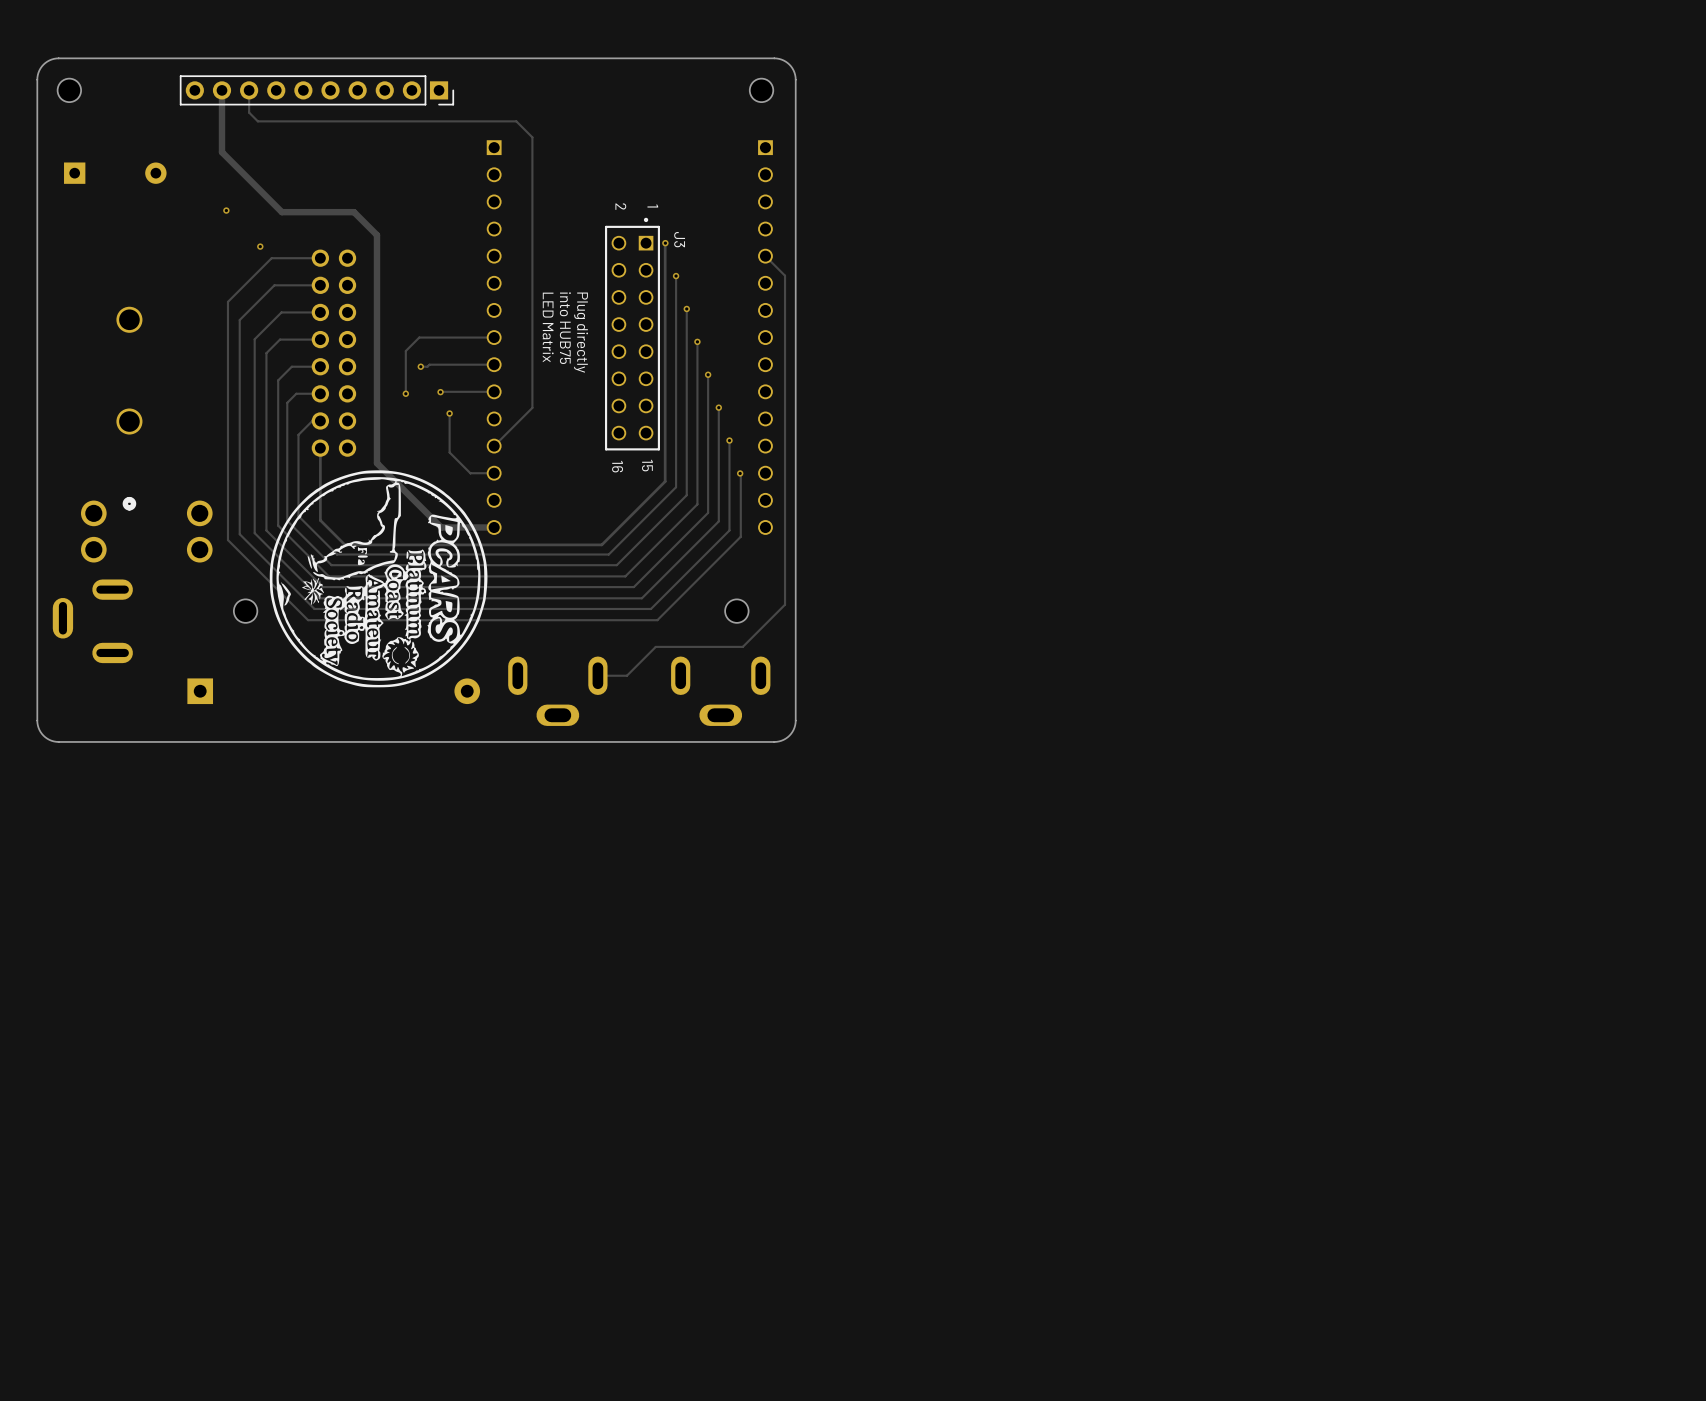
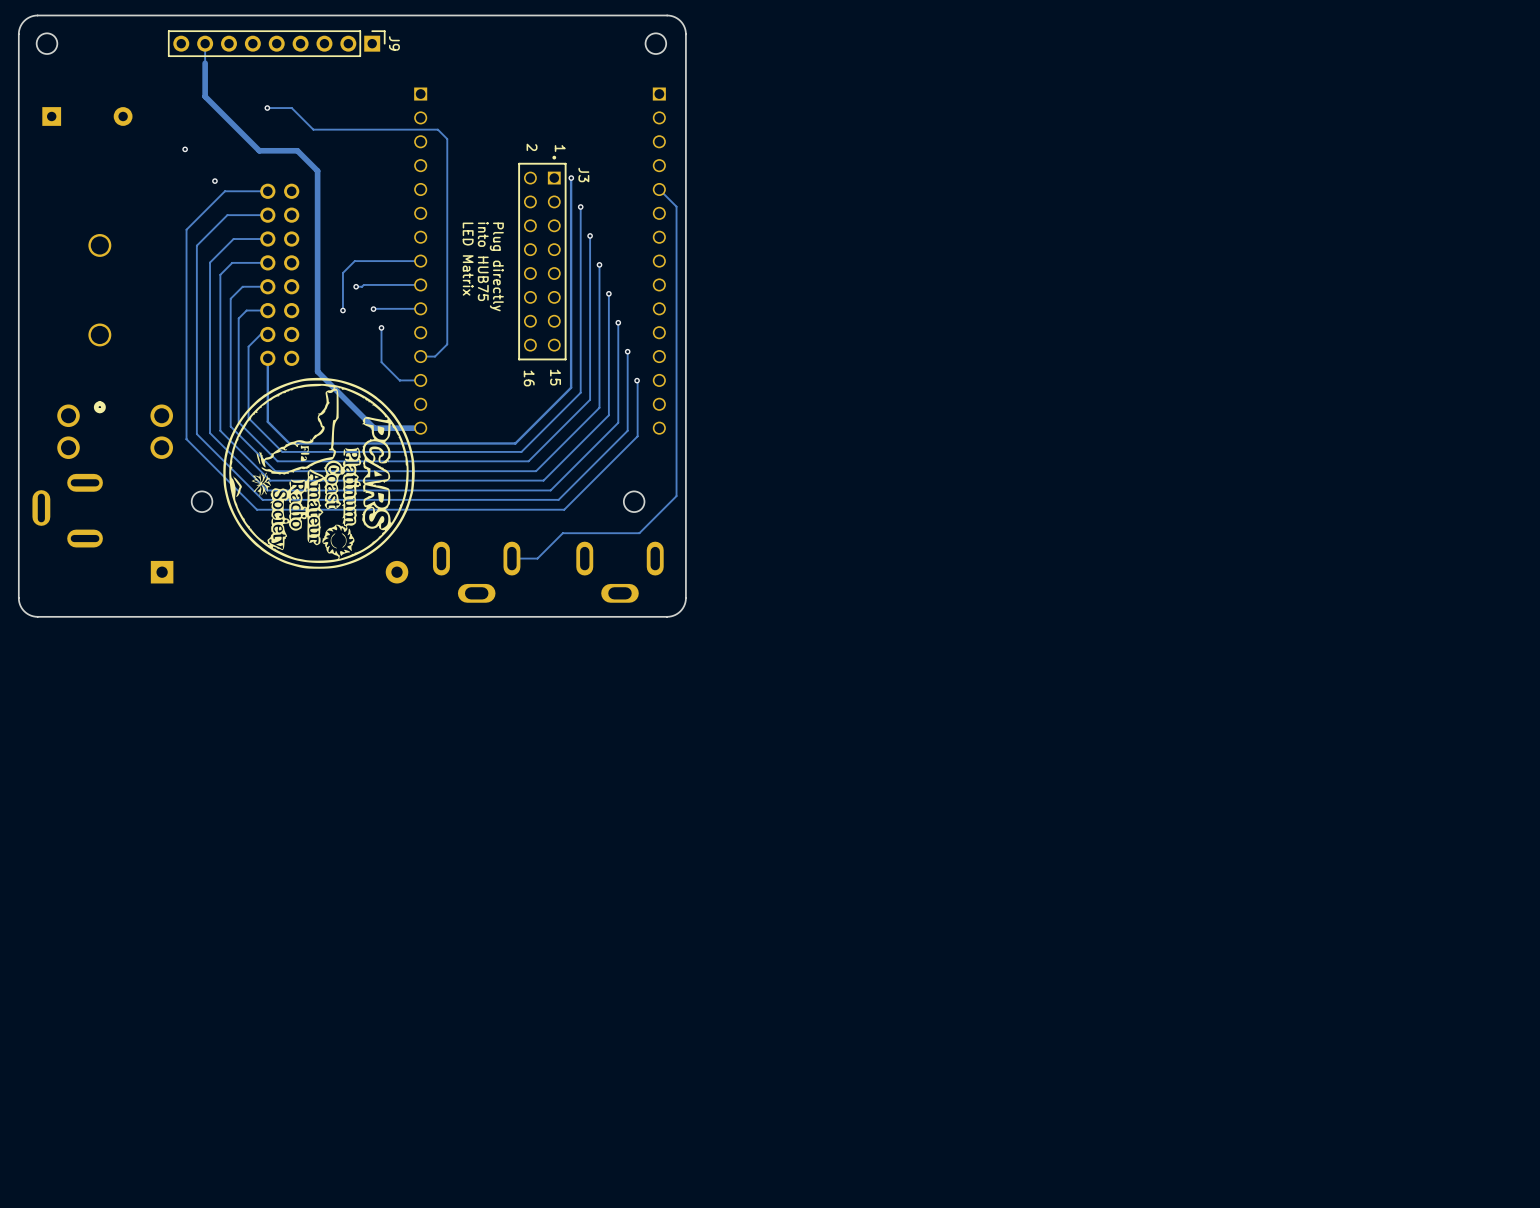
track: (221, 90) (221, 152) (281, 212) (310, 212) -> (205, 63) (205, 96) (259, 150)
part: (316, 90) -> none
J9: none -> (276, 43)
track: (249, 112) (257, 121) (516, 121) (532, 137) (532, 407) (494, 446) -> (267, 108) (291, 108) (313, 129) (437, 129) (447, 139) (447, 344) (435, 356) (420, 356)
via: none -> (267, 108)

